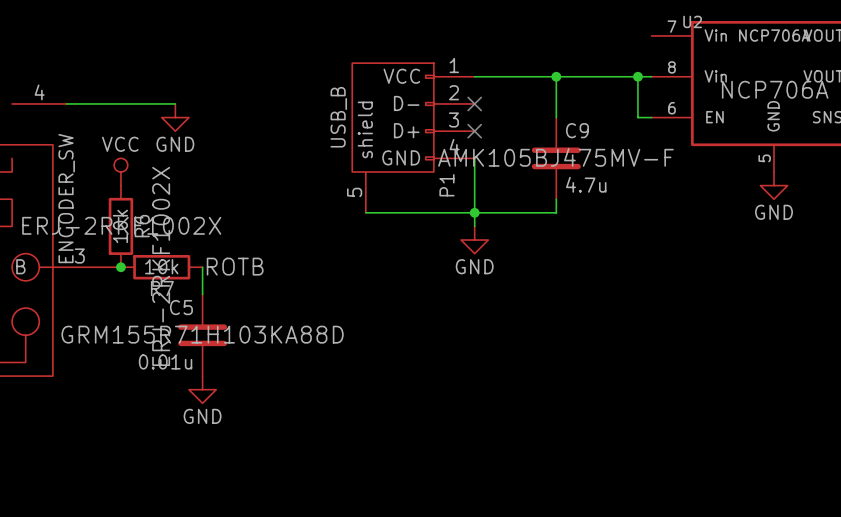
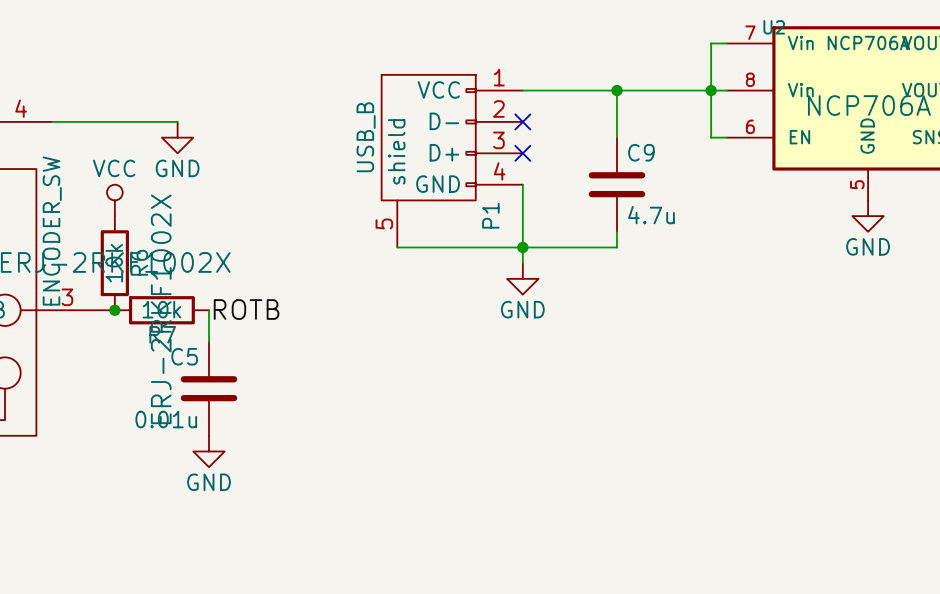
wire: none -> (726, 43) (711, 43) (711, 90)
C9 text: AMK105BJ475MV-F (555, 157) -> none
C5 text: GRM155R71H103KA88D (202, 334) -> none

